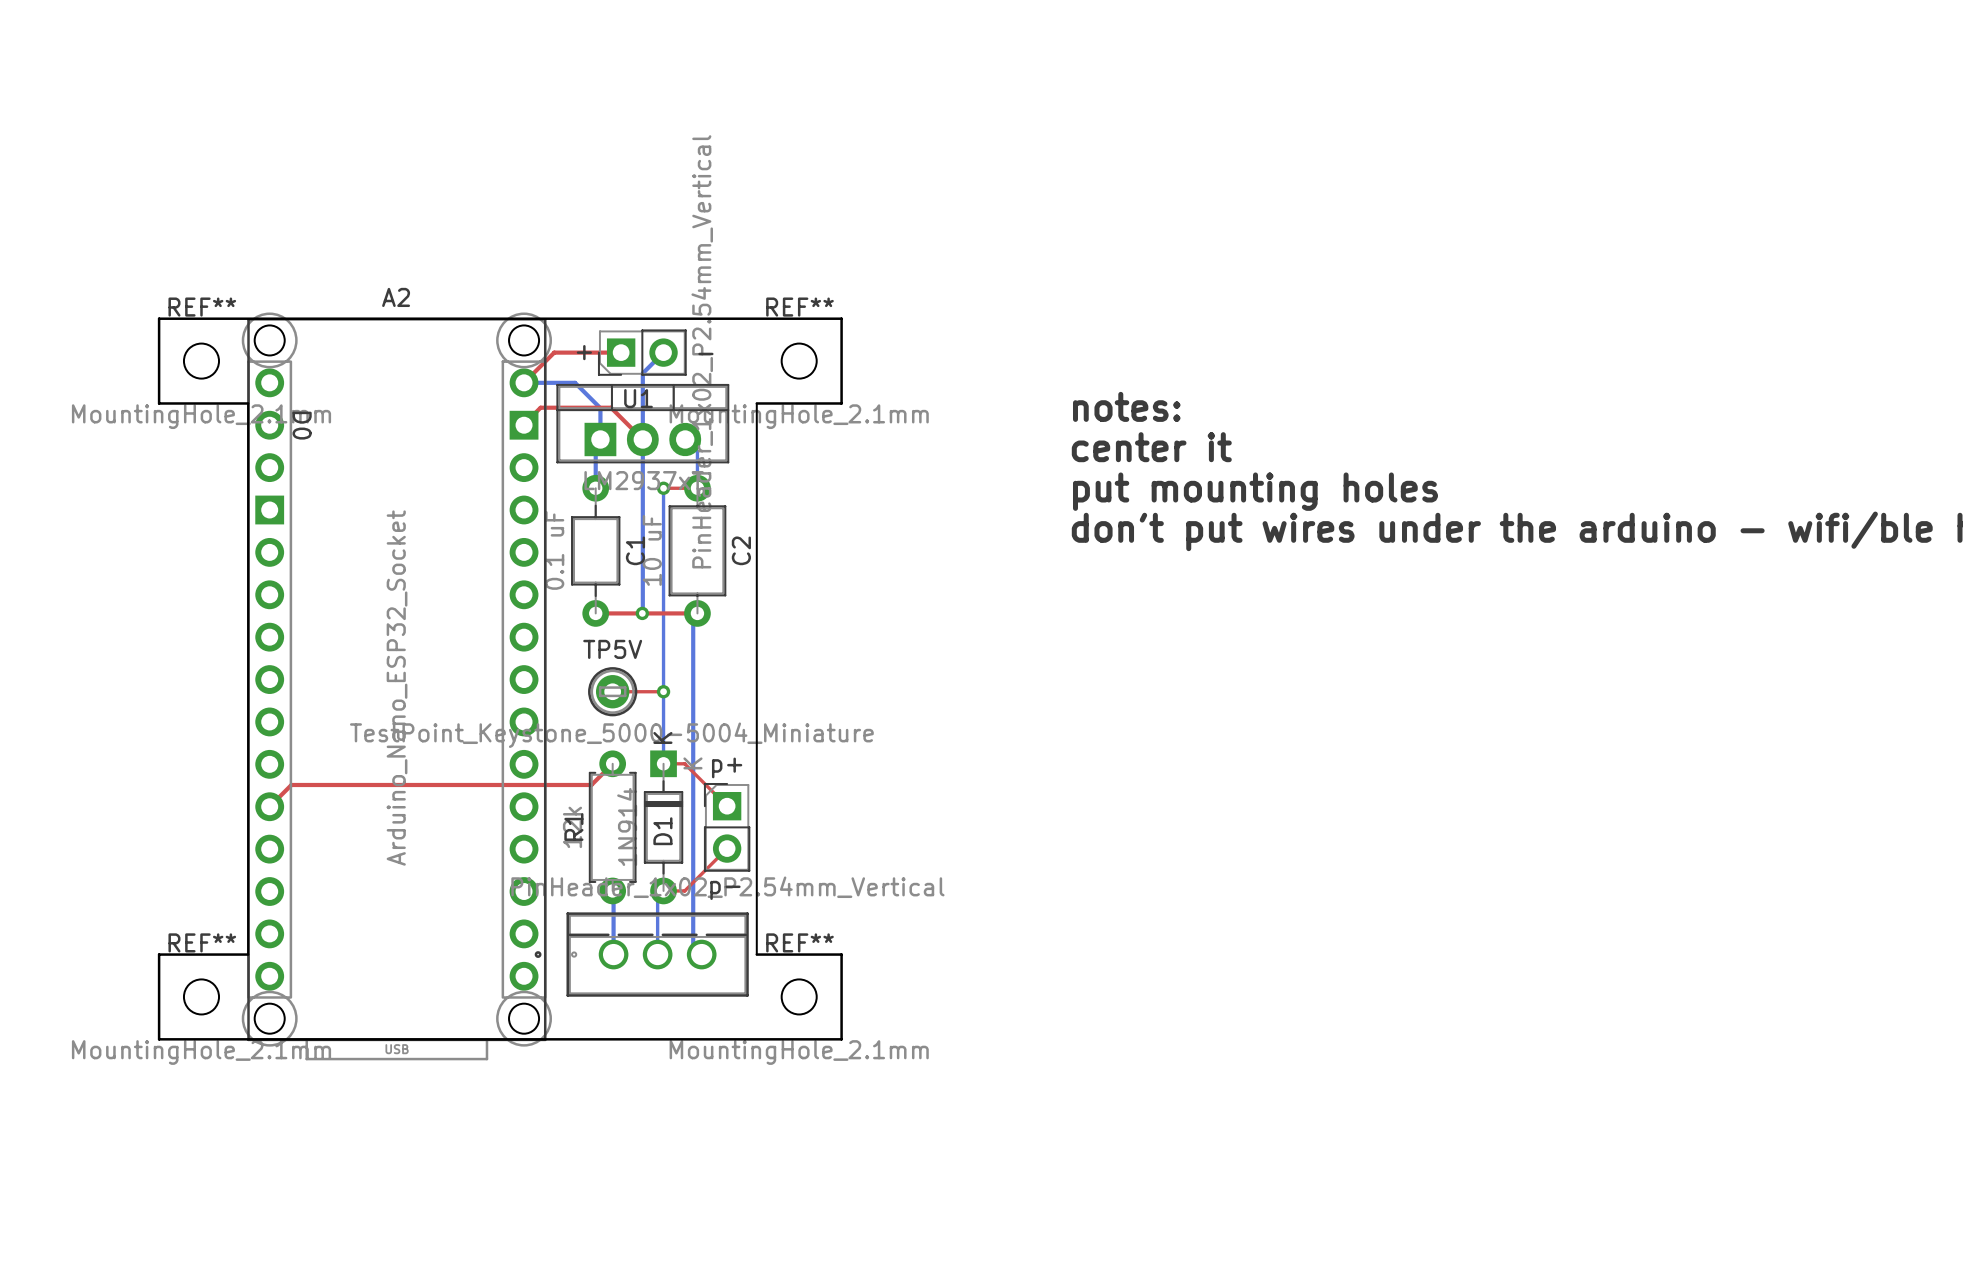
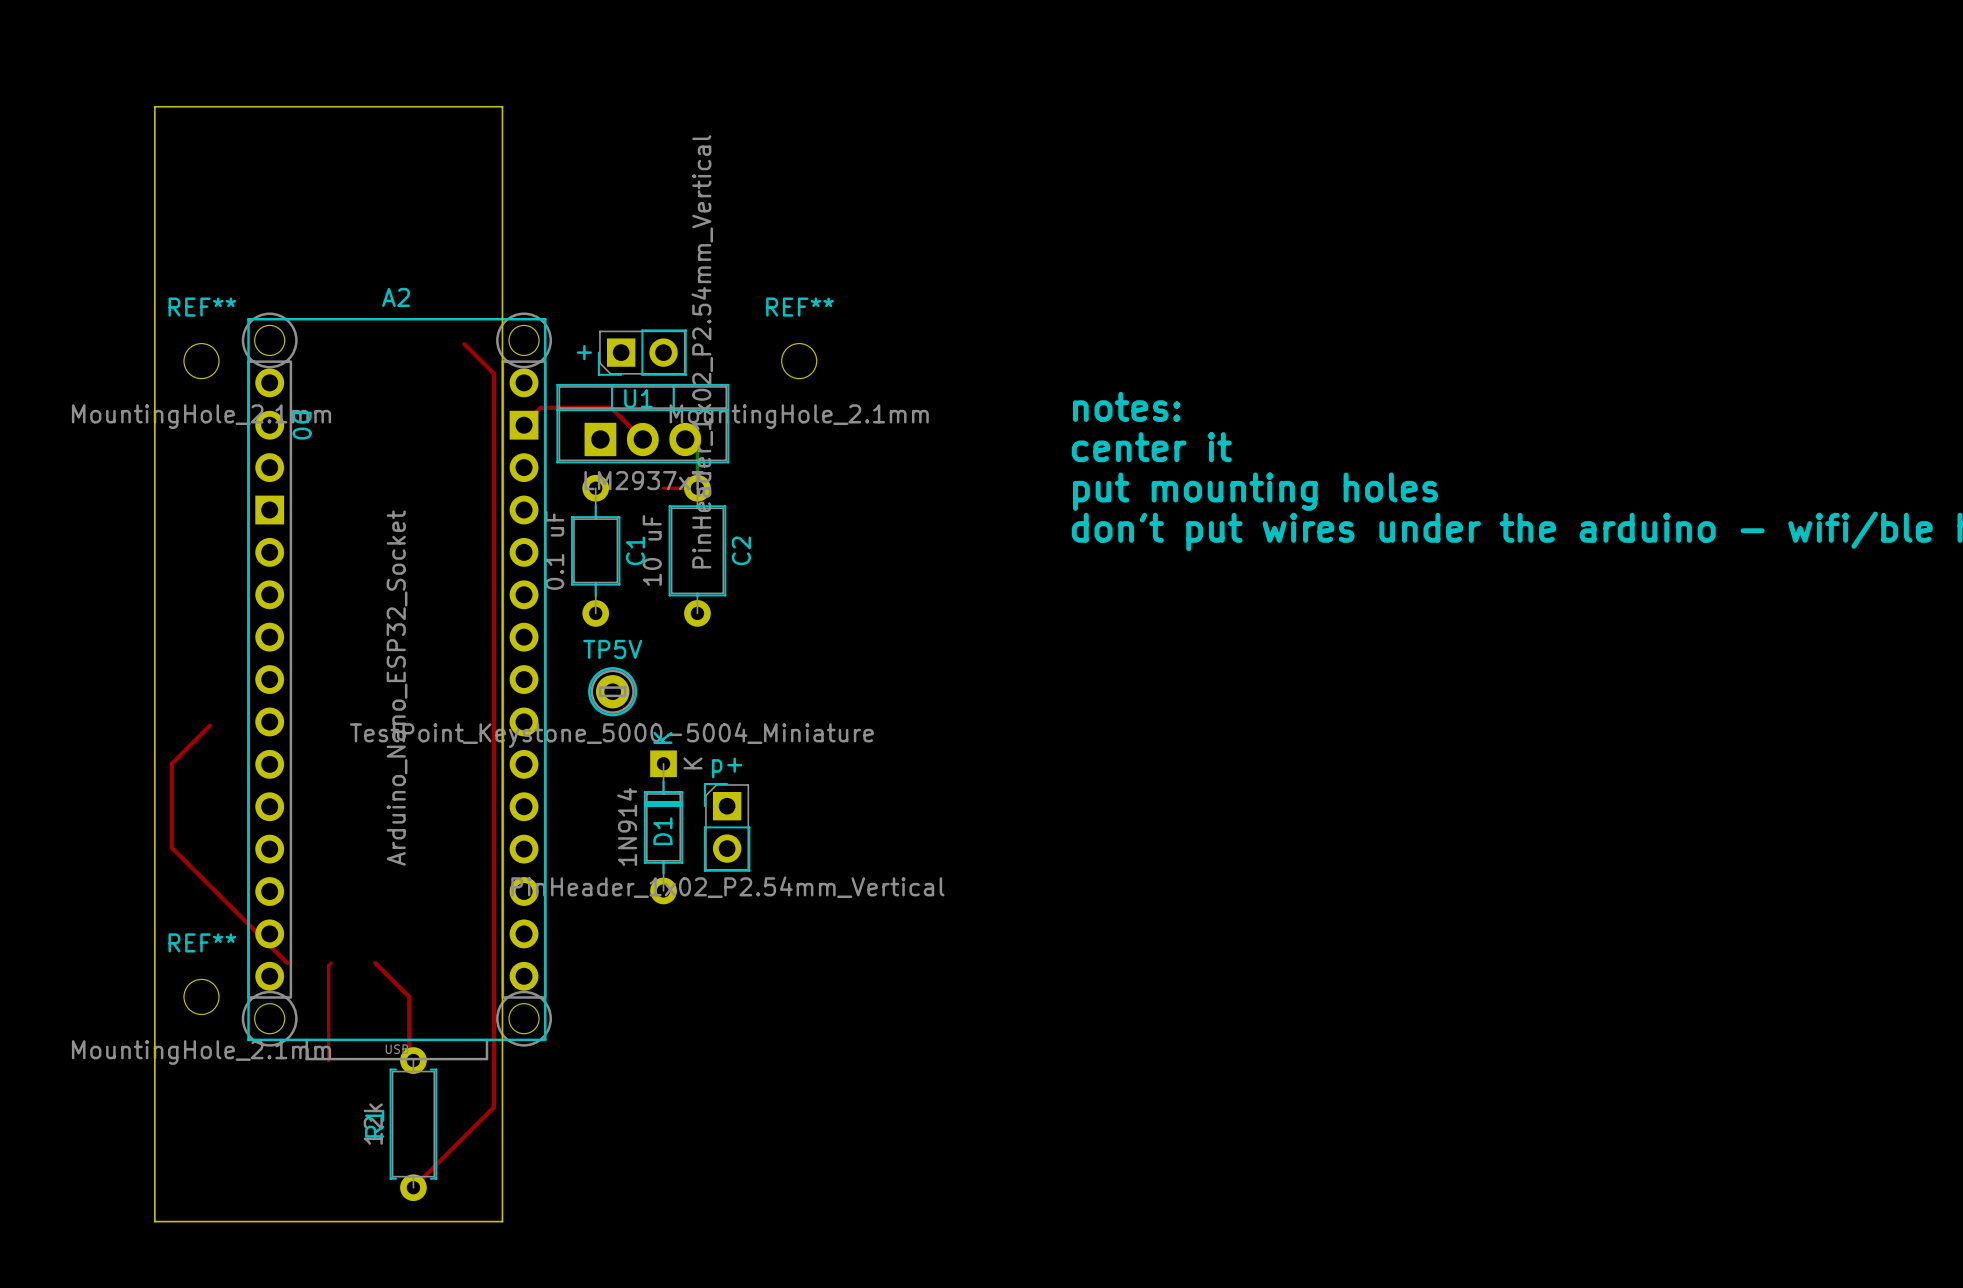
board edge: none -> (154, 106) (502, 106) (502, 1221) (154, 1221) (154, 106)
board edge: (159, 318) (841, 318) (841, 403) (756, 403) (756, 954) (841, 954) (841, 1039) (159, 1039) (159, 954) (248, 954) (248, 403) (159, 403) (159, 318) -> none
top track: none -> (464, 344) (493, 373) (493, 1107) (413, 1187)
top track: (621, 352) (554, 352) (524, 382) -> none
bottom track: (663, 352) (642, 373) (642, 613) -> none
text: - (705, 353) -> none
bottom track: (524, 382) (575, 382) (600, 408) (600, 439) (595, 444) (595, 488) -> none
bottom track: (663, 488) (663, 763) -> none
via: (663, 488) -> none
top track: (595, 613) (697, 613) -> none
via: (642, 613) -> none
bottom track: (697, 613) (693, 617) (693, 946) (701, 954) -> none
top track: (612, 691) (663, 691) -> none
via: (663, 691) -> none
top track: none -> (209, 725) (171, 763) (171, 847) (287, 963)
top track: (612, 763) (591, 784) (291, 784) (269, 806) -> none
top track: (663, 763) (684, 763) (727, 806) -> none
R1 position: (612, 827) -> (413, 1124)
top track: (727, 848) (684, 890) (663, 890) -> none
bottom track: (612, 890) (613, 954) -> none
bottom track: (663, 890) (657, 896) (657, 954) -> none
text: p- (725, 890) -> none
part: (641, 954) -> none
top track: none -> (331, 963) (328, 965) (328, 1060)
top track: none -> (375, 963) (409, 996) (409, 1056) (413, 1060)
REF**: MountingHole_2.1mm (799, 996) -> none

